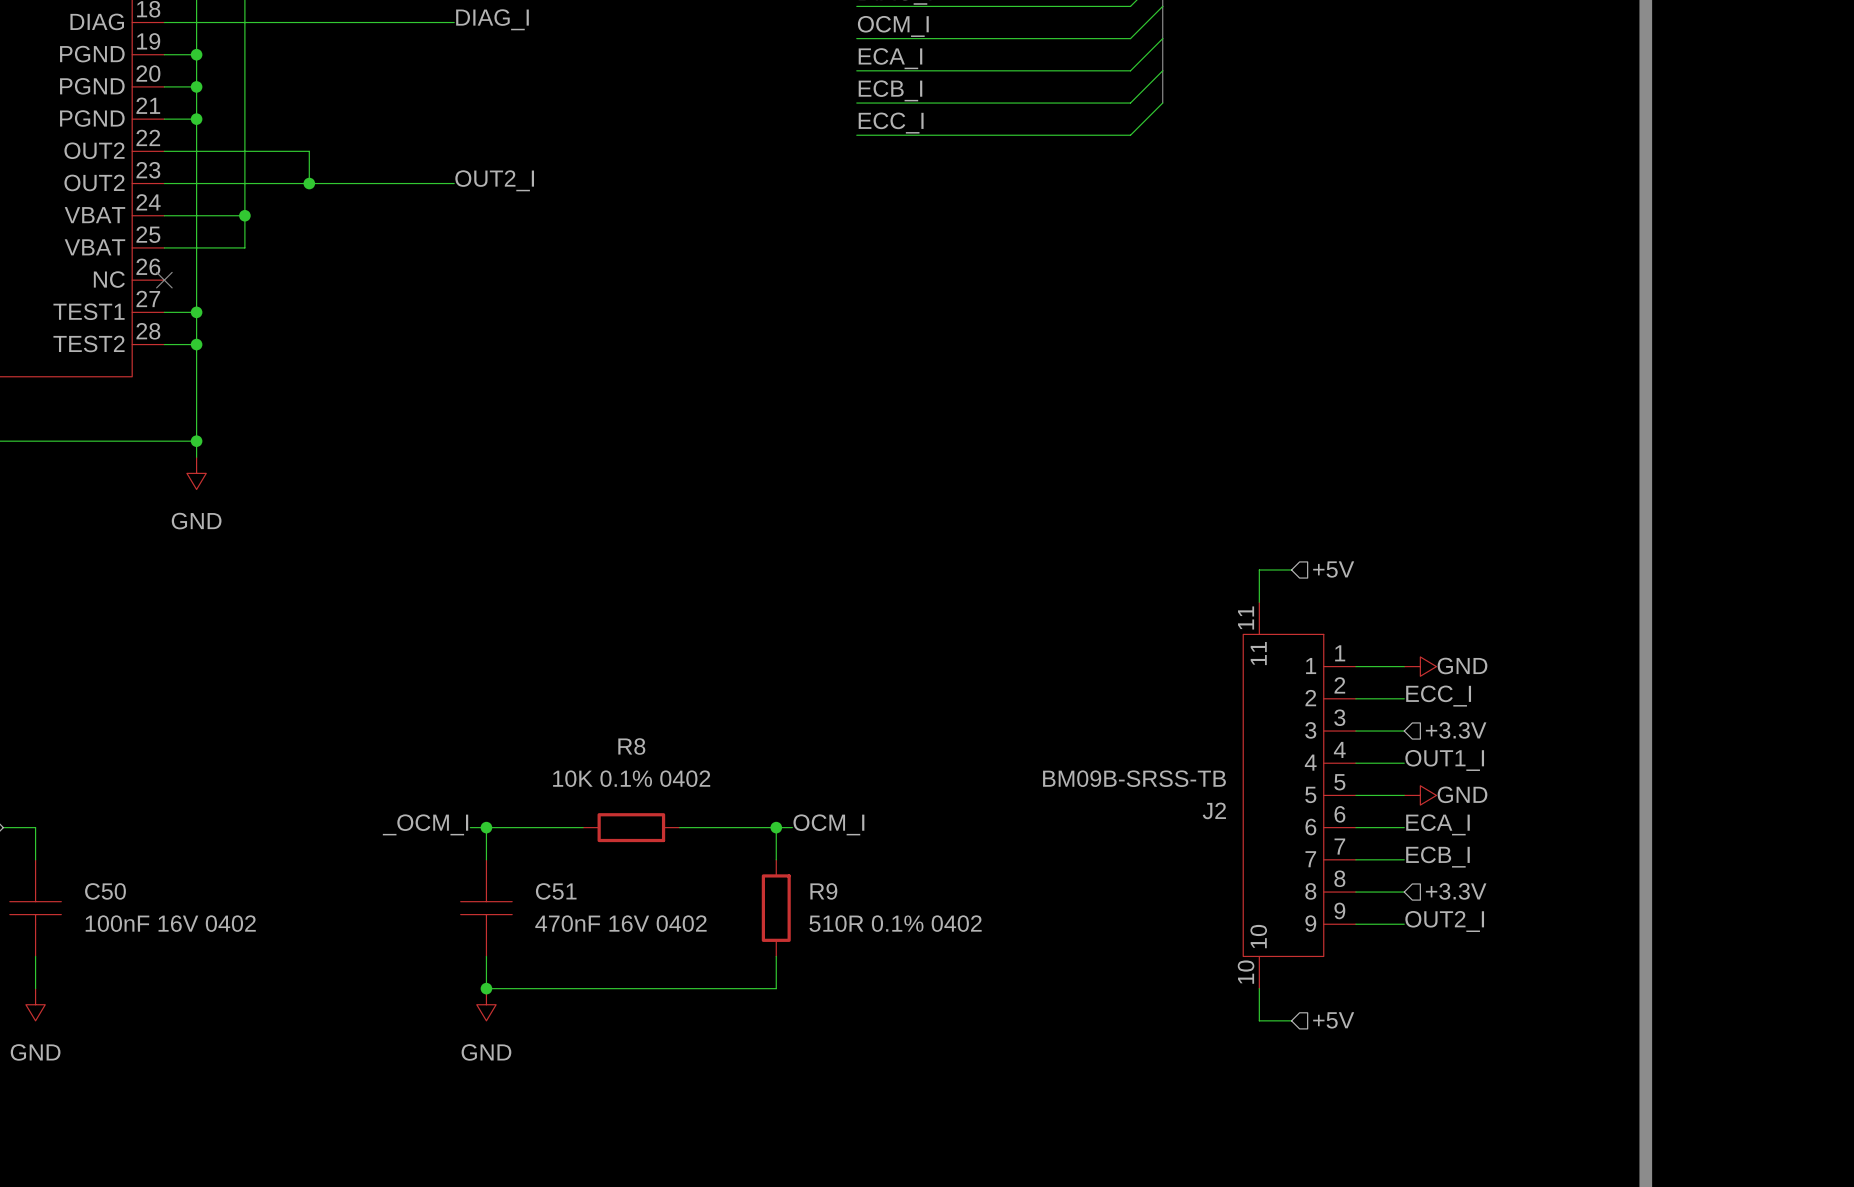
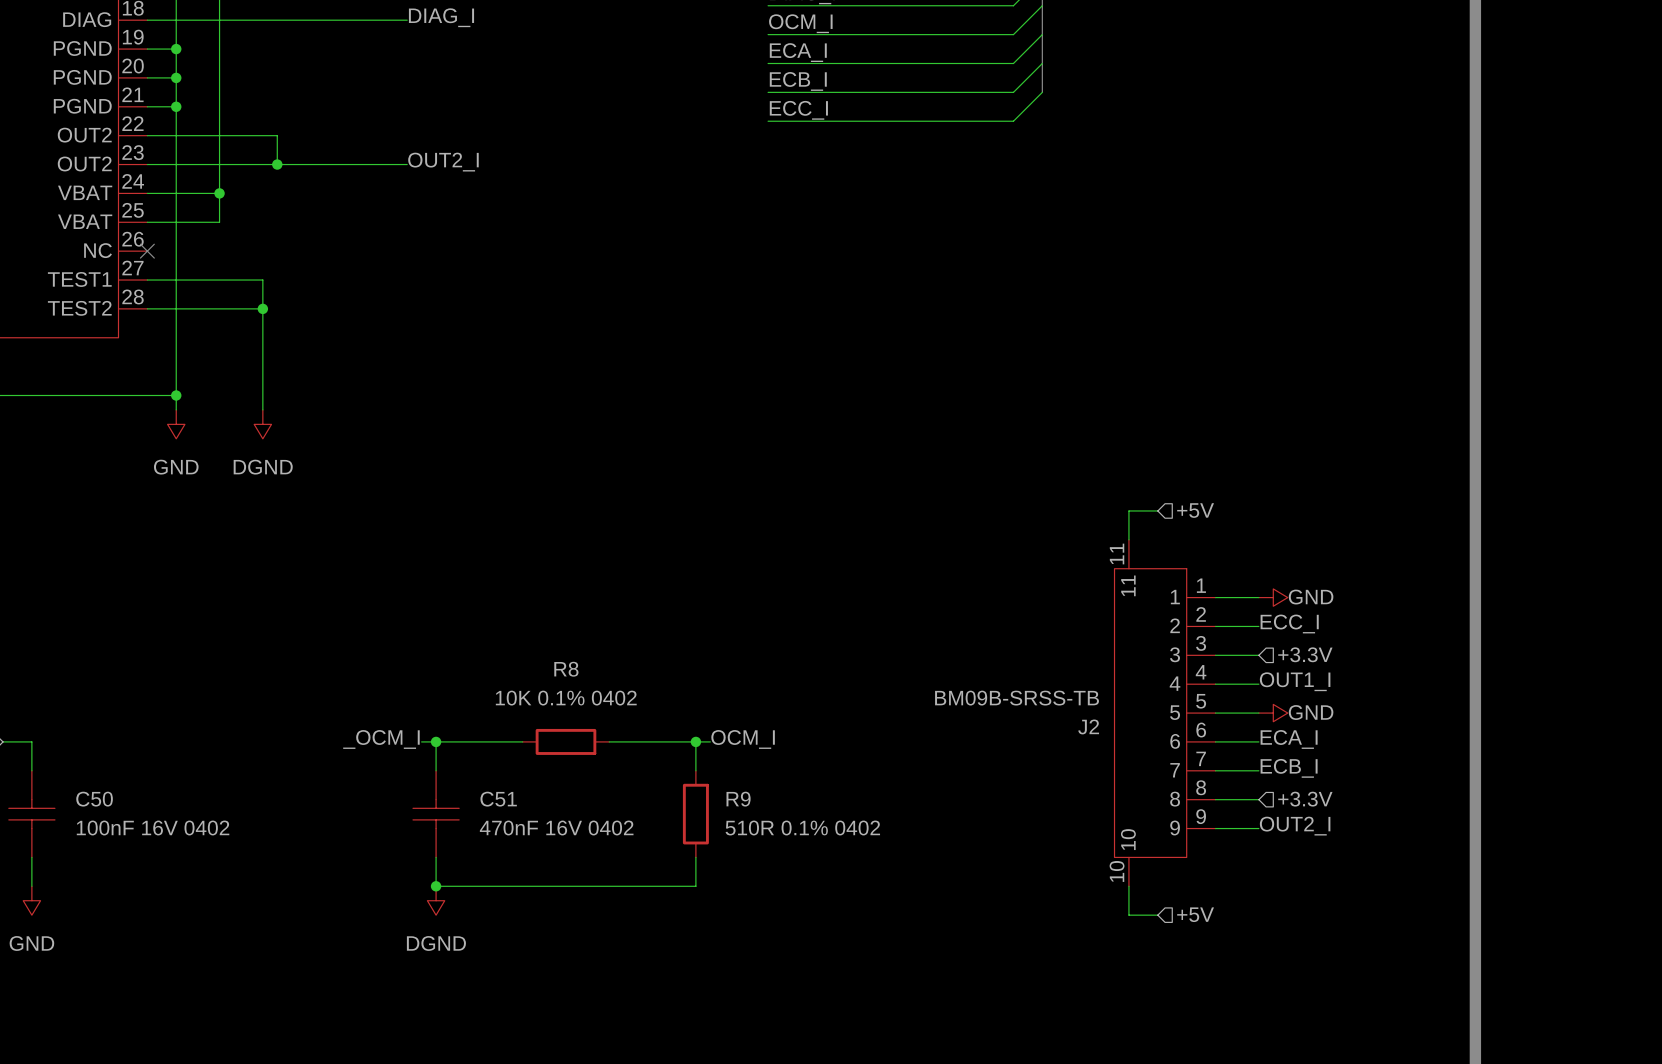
wire: none -> (176, 280) (262, 280) (262, 409)
junction: (196, 312) -> none
wire: none -> (176, 308) (262, 308)
junction: (196, 344) -> none
junction: none -> (262, 308)
power symbol: none -> DGND (262, 424)
power symbol: GND (486, 1004) -> DGND (436, 900)

